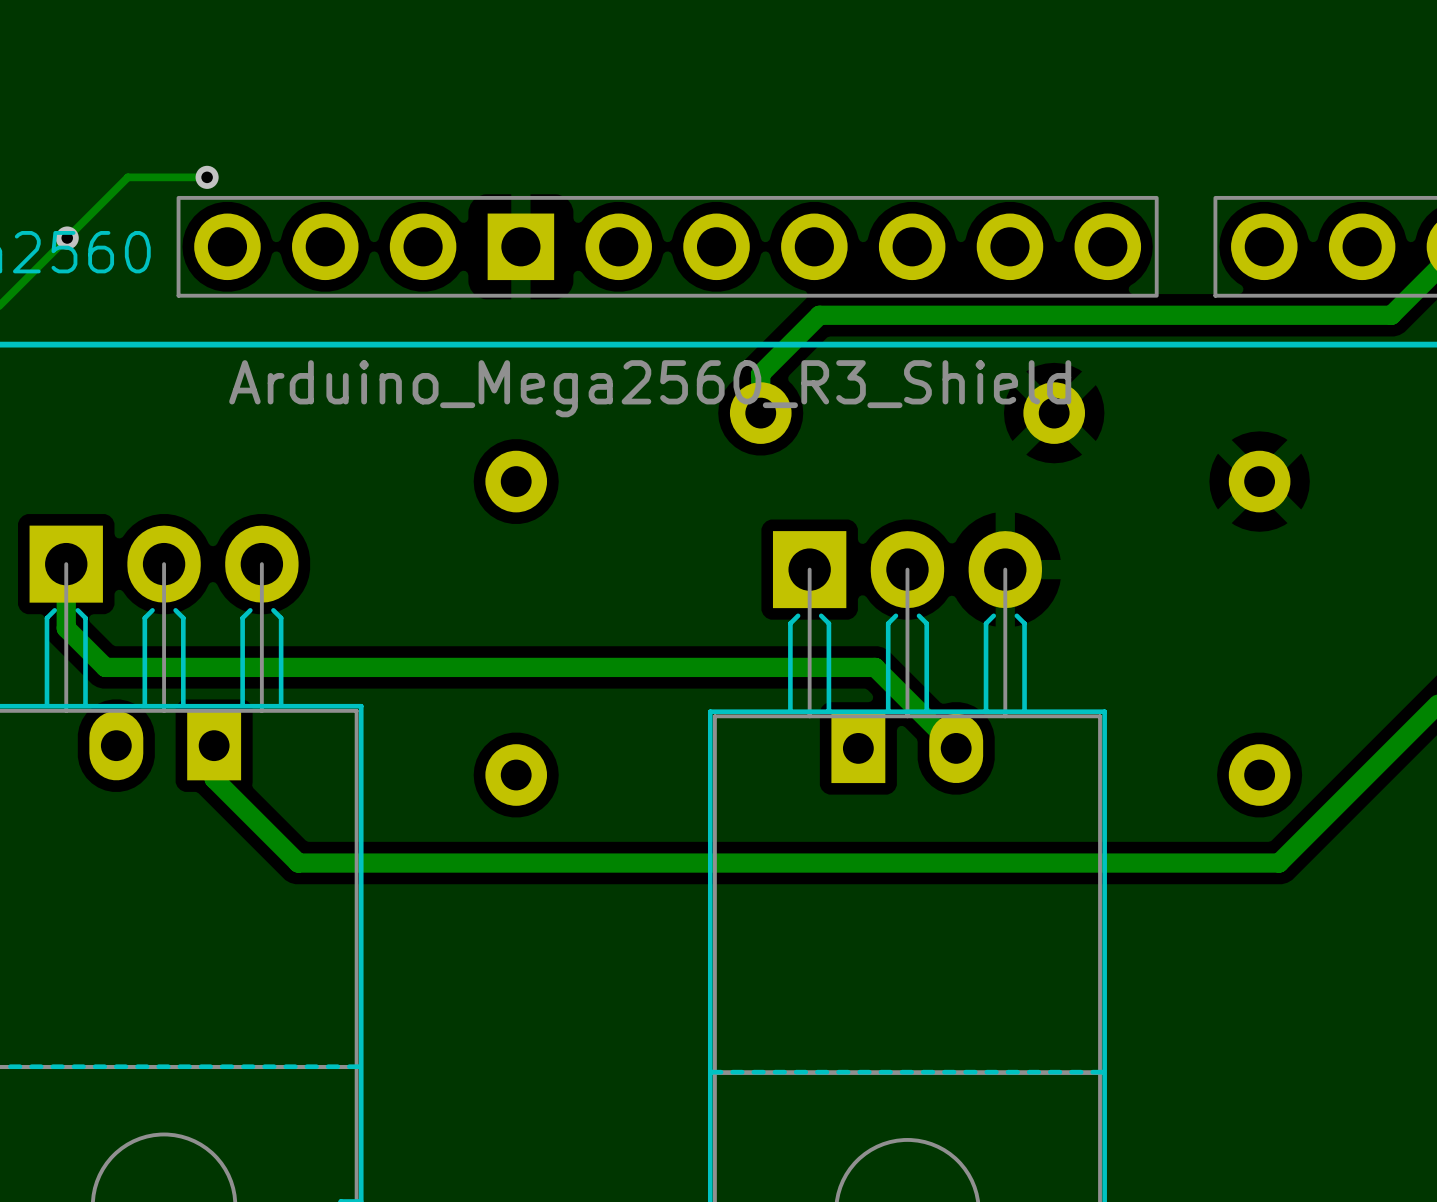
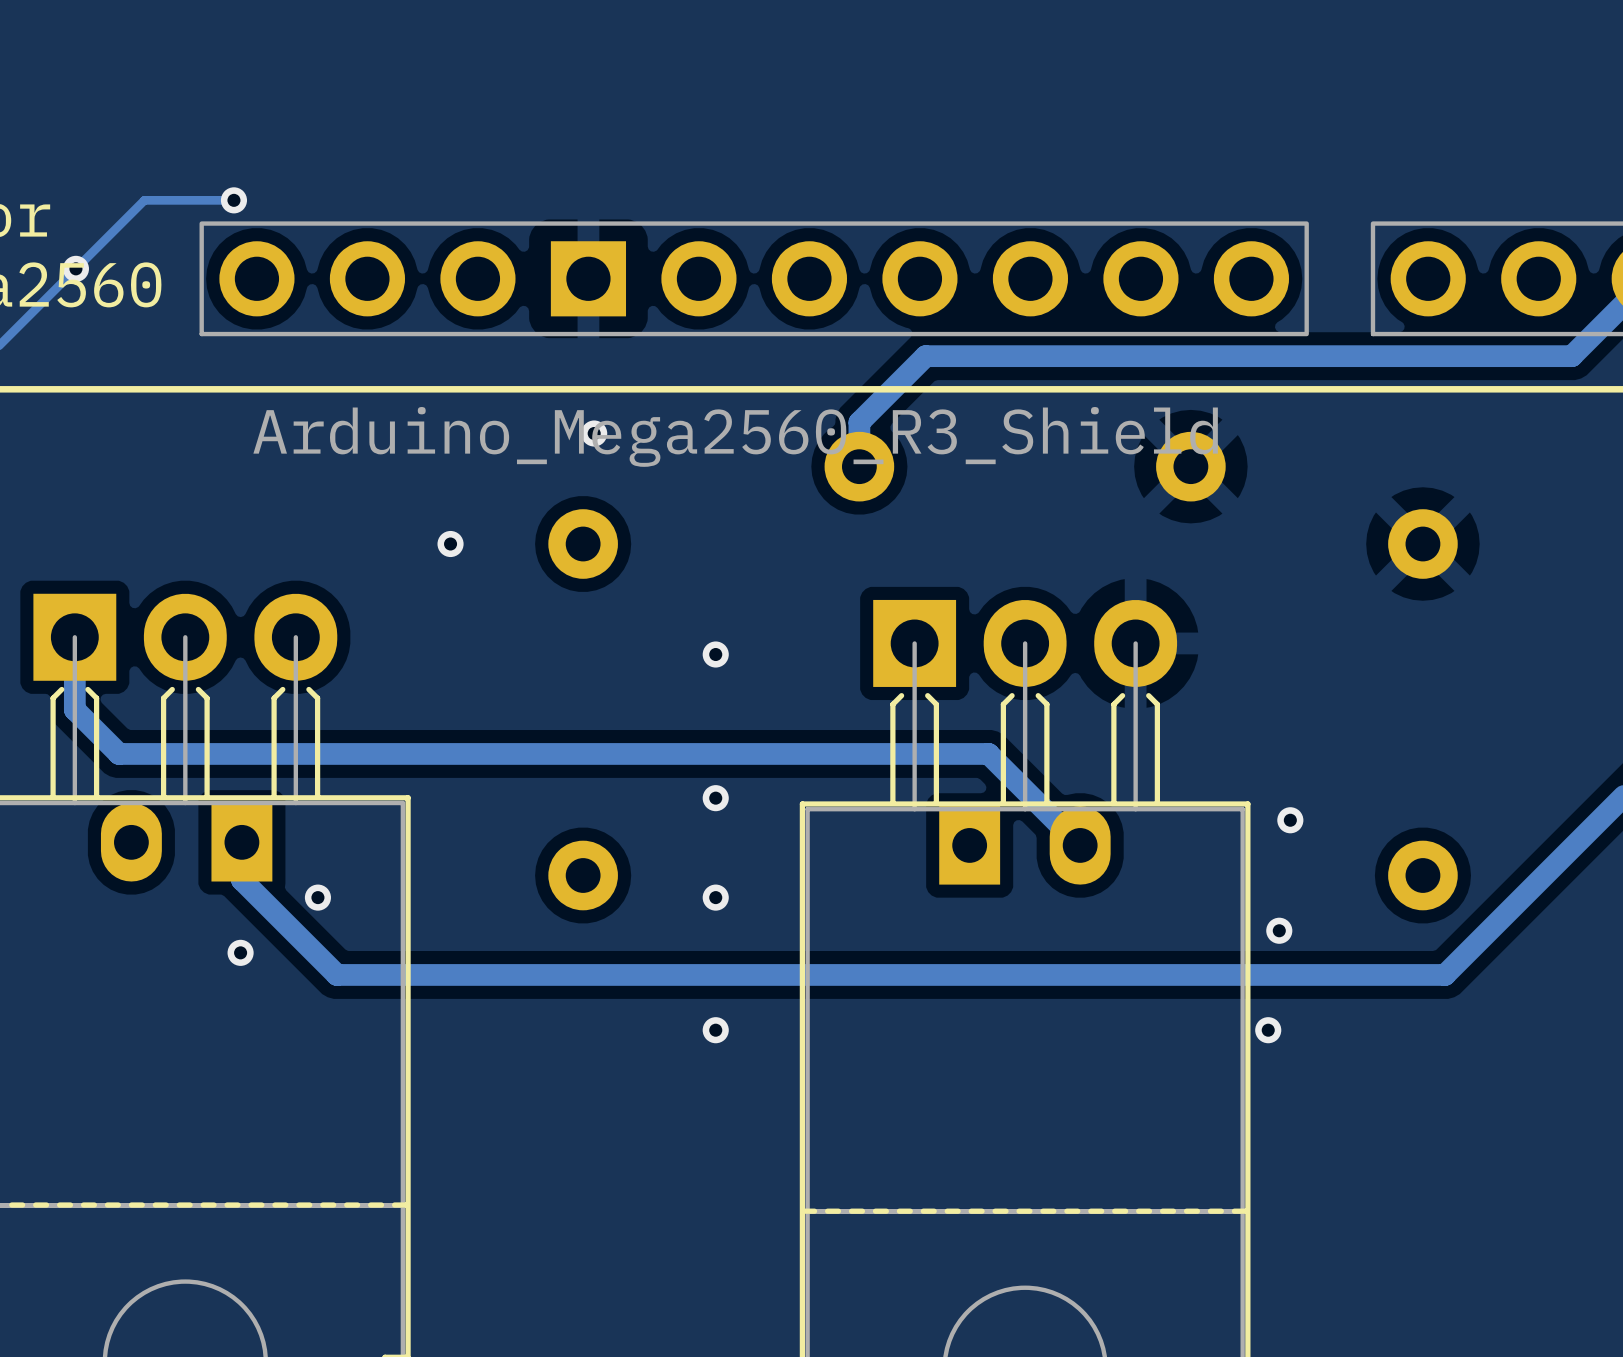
via: none -> (594, 433)
via: none -> (450, 544)
via: none -> (715, 654)
via: none -> (715, 798)
via: none -> (1290, 820)
via: none -> (317, 897)
via: none -> (715, 897)
via: none -> (1279, 930)
via: none -> (240, 952)
via: none -> (715, 1030)
via: none -> (1268, 1030)

